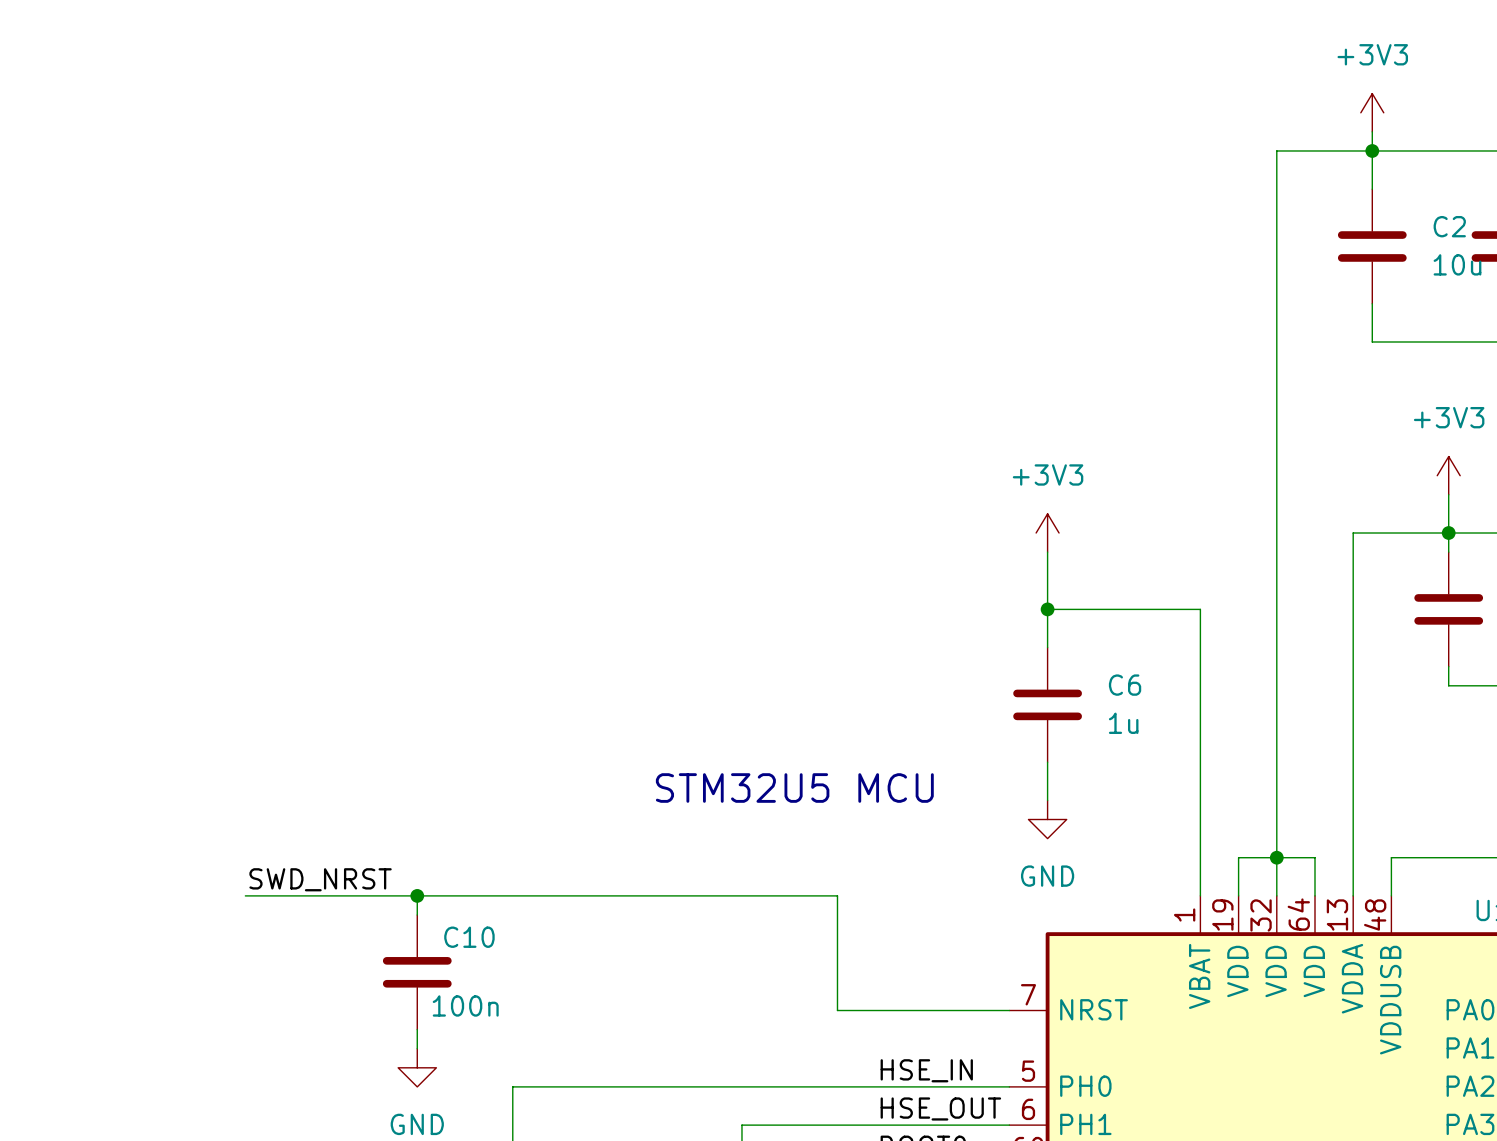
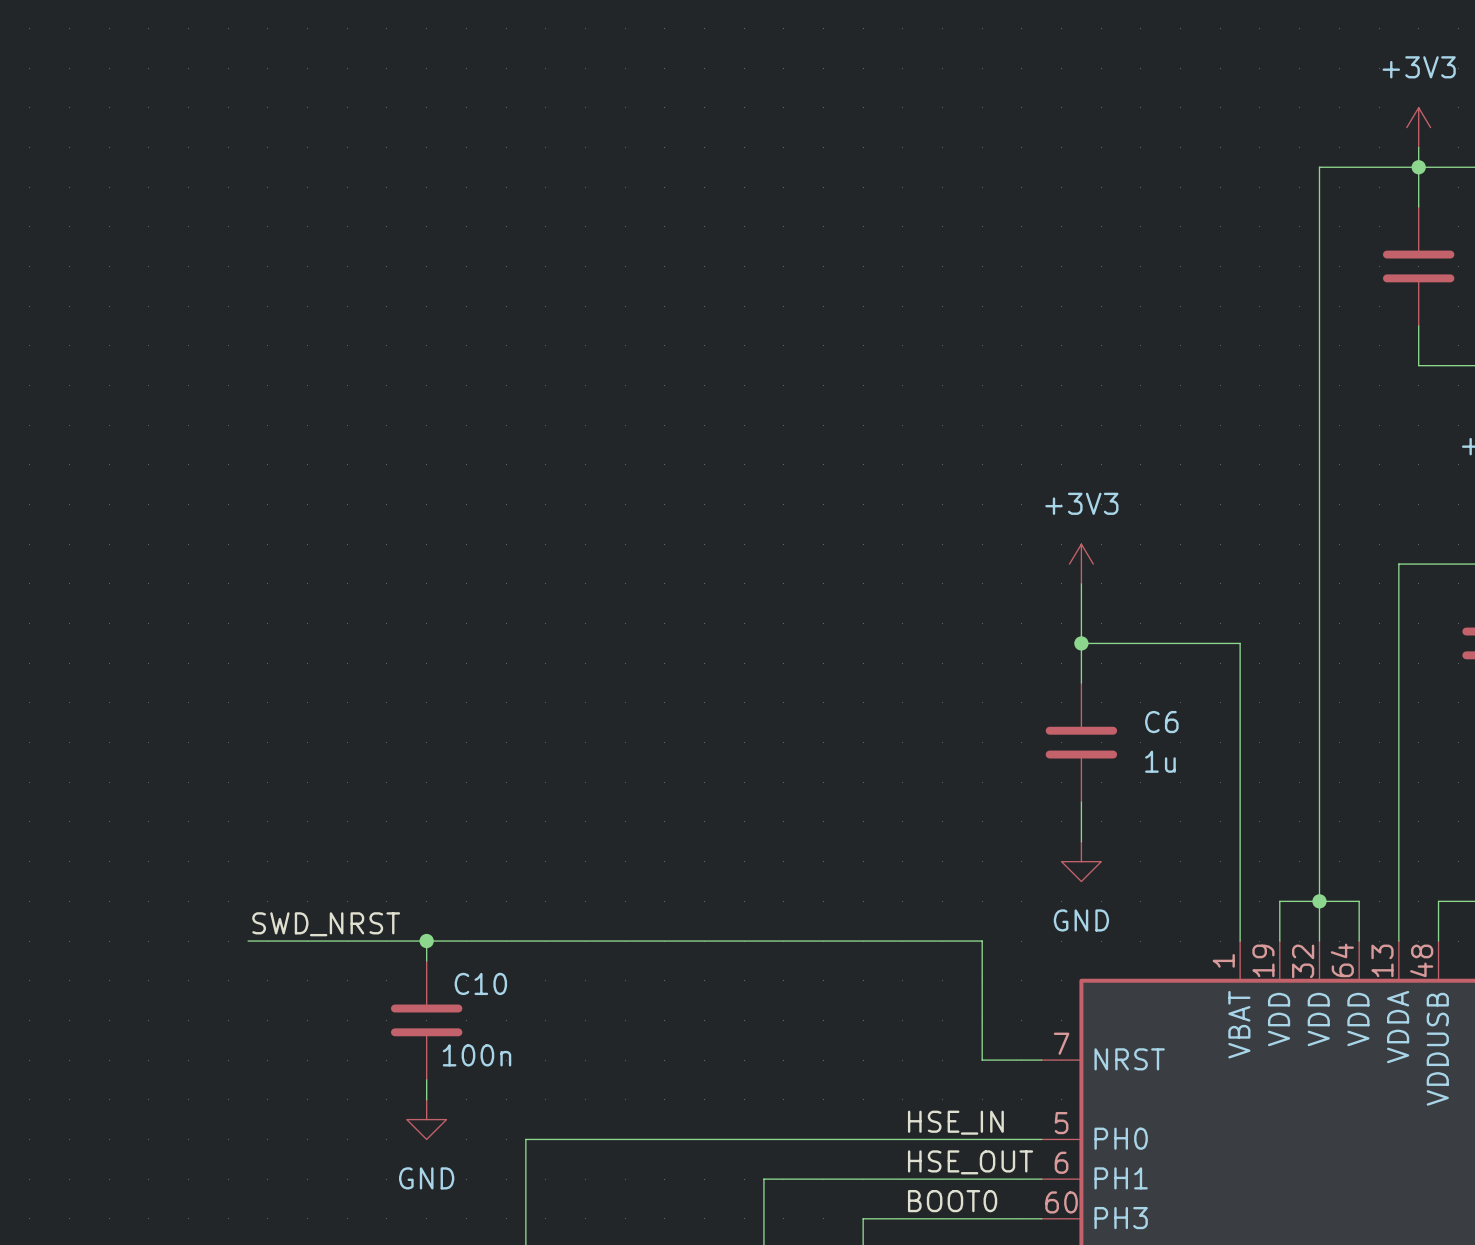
text: STM32U5 MCU (794, 788) -> none
wire: (837, 895) (837, 1010) (952, 1010) -> (863, 941) (982, 941) (982, 1060)

